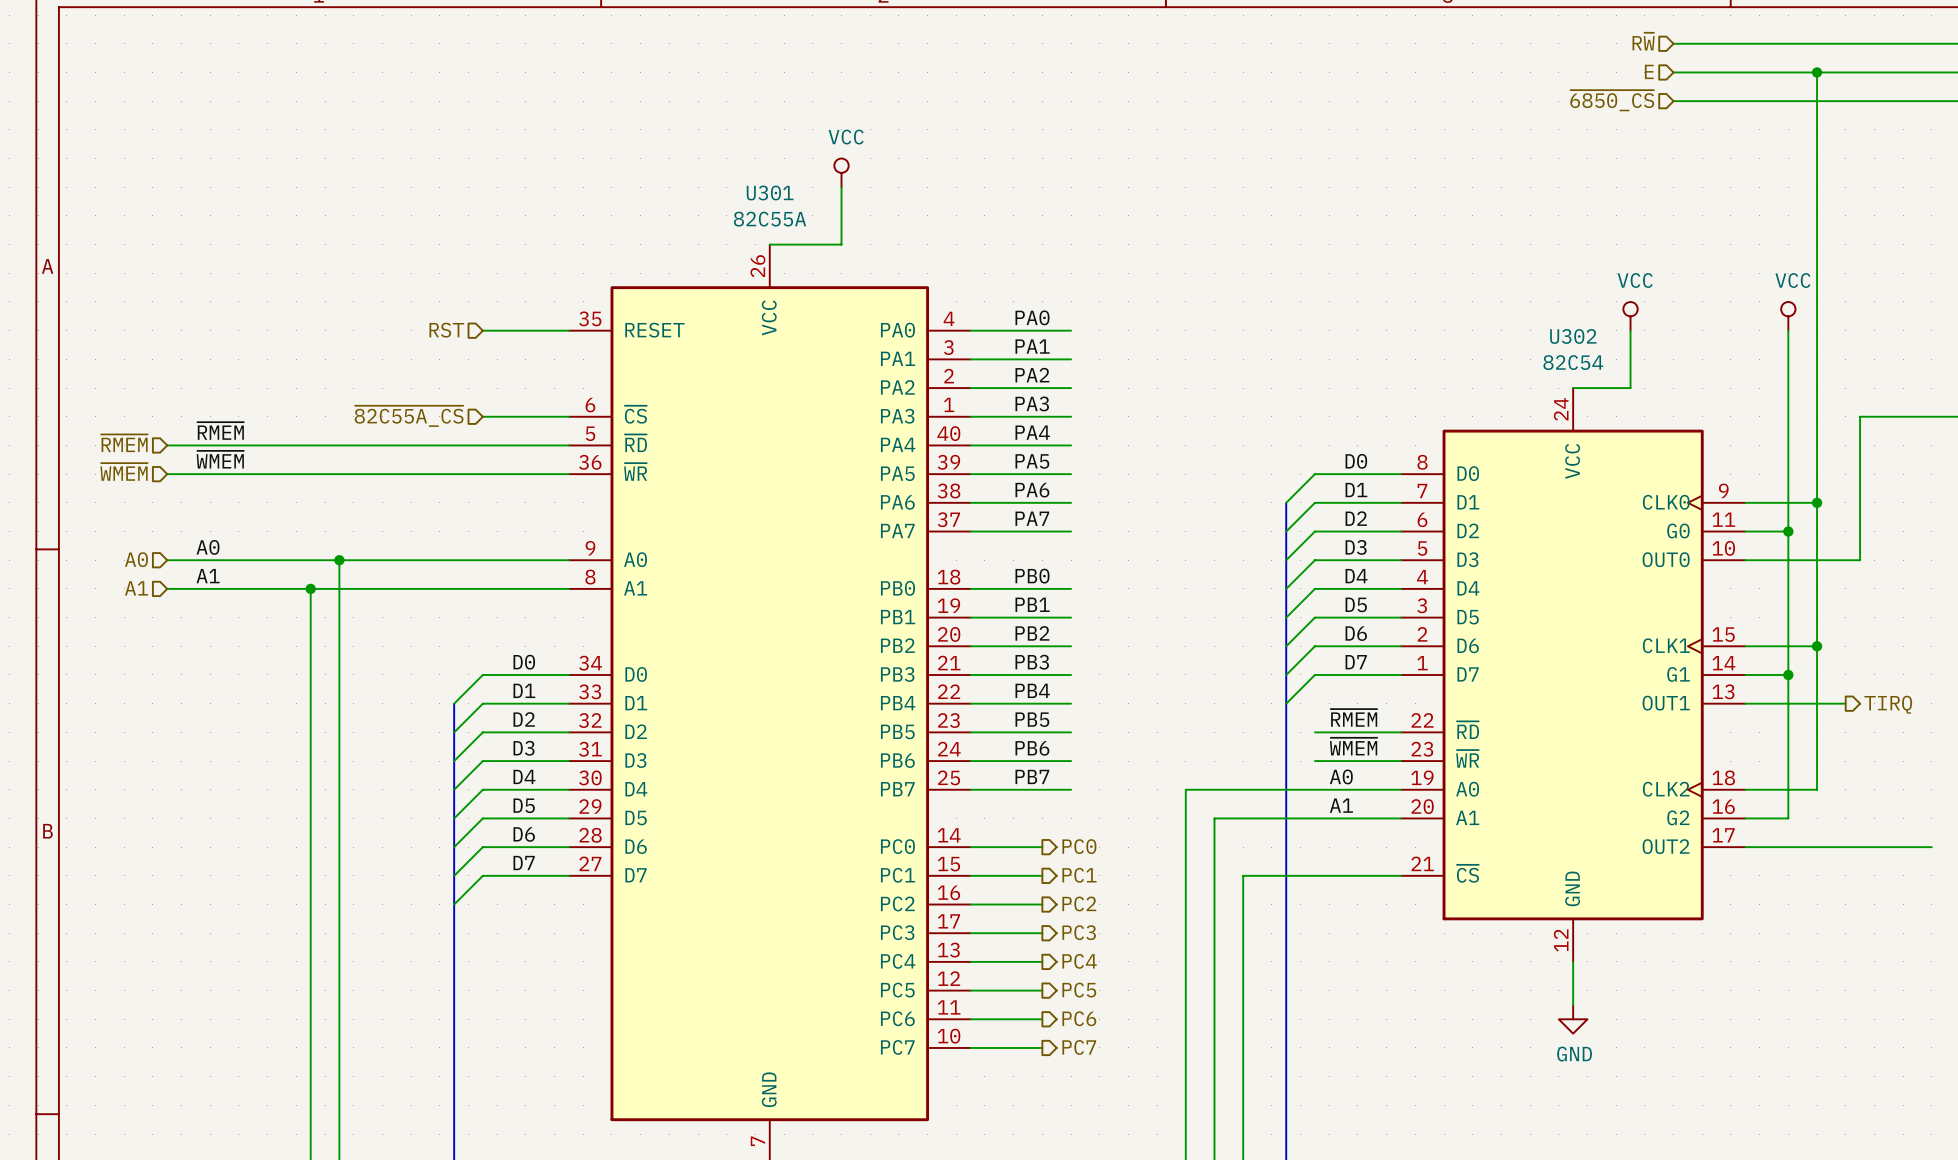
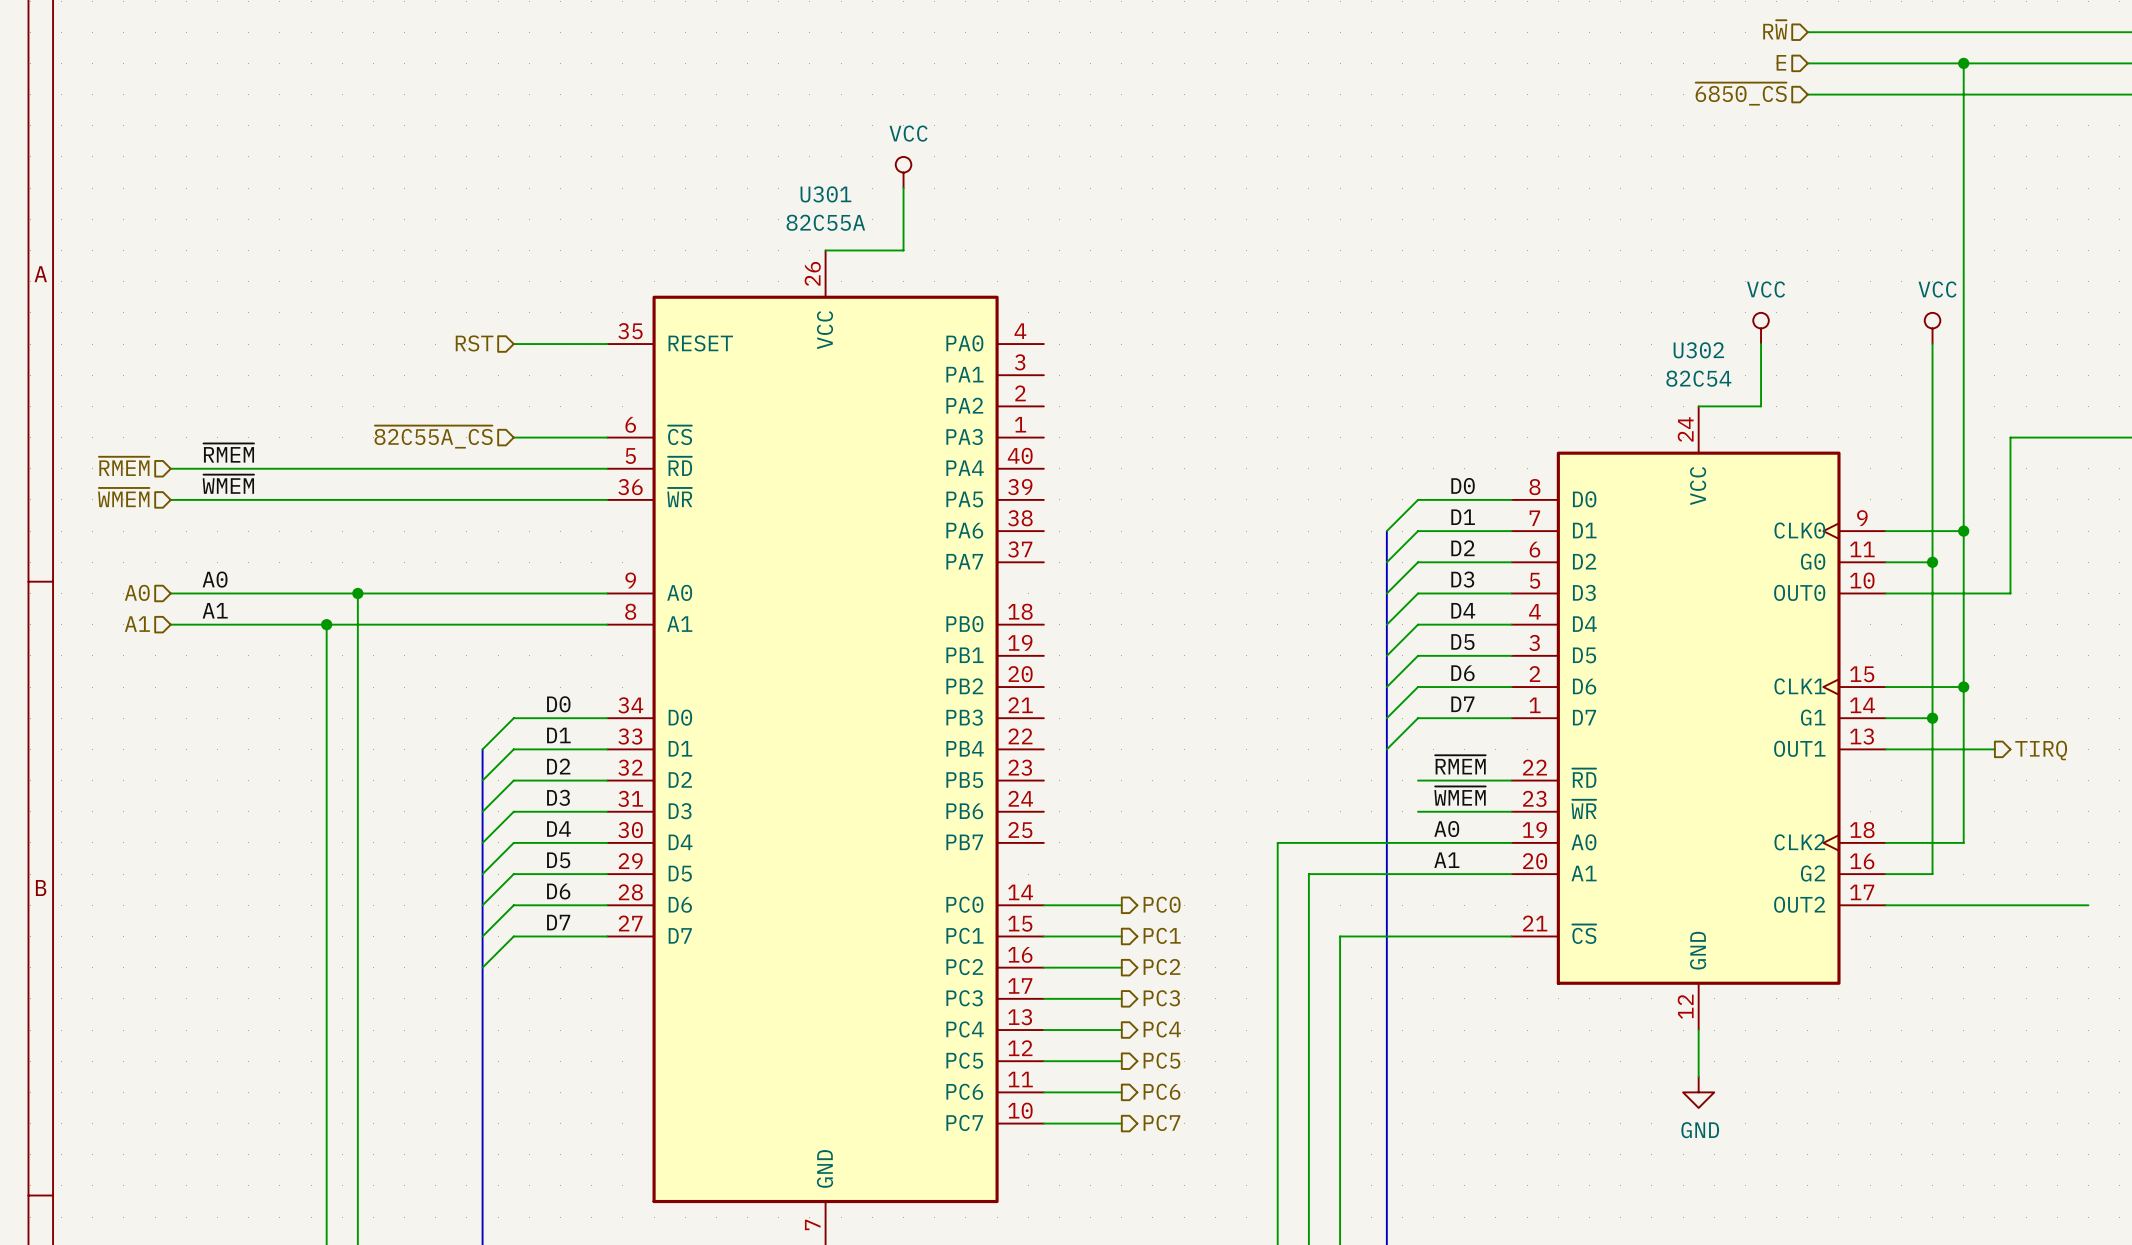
label: PA0 (1032, 317) -> none
wire: (970, 330) (1071, 330) -> none
label: PA1 (1032, 346) -> none
wire: (970, 359) (1071, 359) -> none
label: PA2 (1032, 375) -> none
wire: (970, 388) (1071, 388) -> none
label: PA3 (1032, 403) -> none
wire: (970, 416) (1071, 416) -> none
label: PA4 (1032, 432) -> none
wire: (970, 445) (1071, 445) -> none
label: PA5 (1032, 461) -> none
wire: (970, 474) (1071, 474) -> none
label: PA6 (1032, 490) -> none
wire: (970, 502) (1071, 502) -> none
label: PA7 (1032, 518) -> none
wire: (970, 531) (1071, 531) -> none
label: PB0 (1032, 576) -> none
wire: (970, 588) (1071, 588) -> none
label: PB1 (1032, 604) -> none
wire: (970, 617) (1071, 617) -> none
label: PB2 (1032, 633) -> none
wire: (970, 646) (1071, 646) -> none
label: PB3 (1032, 662) -> none
wire: (970, 674) (1071, 674) -> none
label: PB4 (1032, 690) -> none
wire: (970, 703) (1071, 703) -> none
label: PB5 (1032, 719) -> none
wire: (970, 732) (1071, 732) -> none
label: PB6 (1032, 748) -> none
wire: (970, 761) (1071, 761) -> none
label: PB7 (1032, 776) -> none
wire: (970, 789) (1071, 789) -> none

